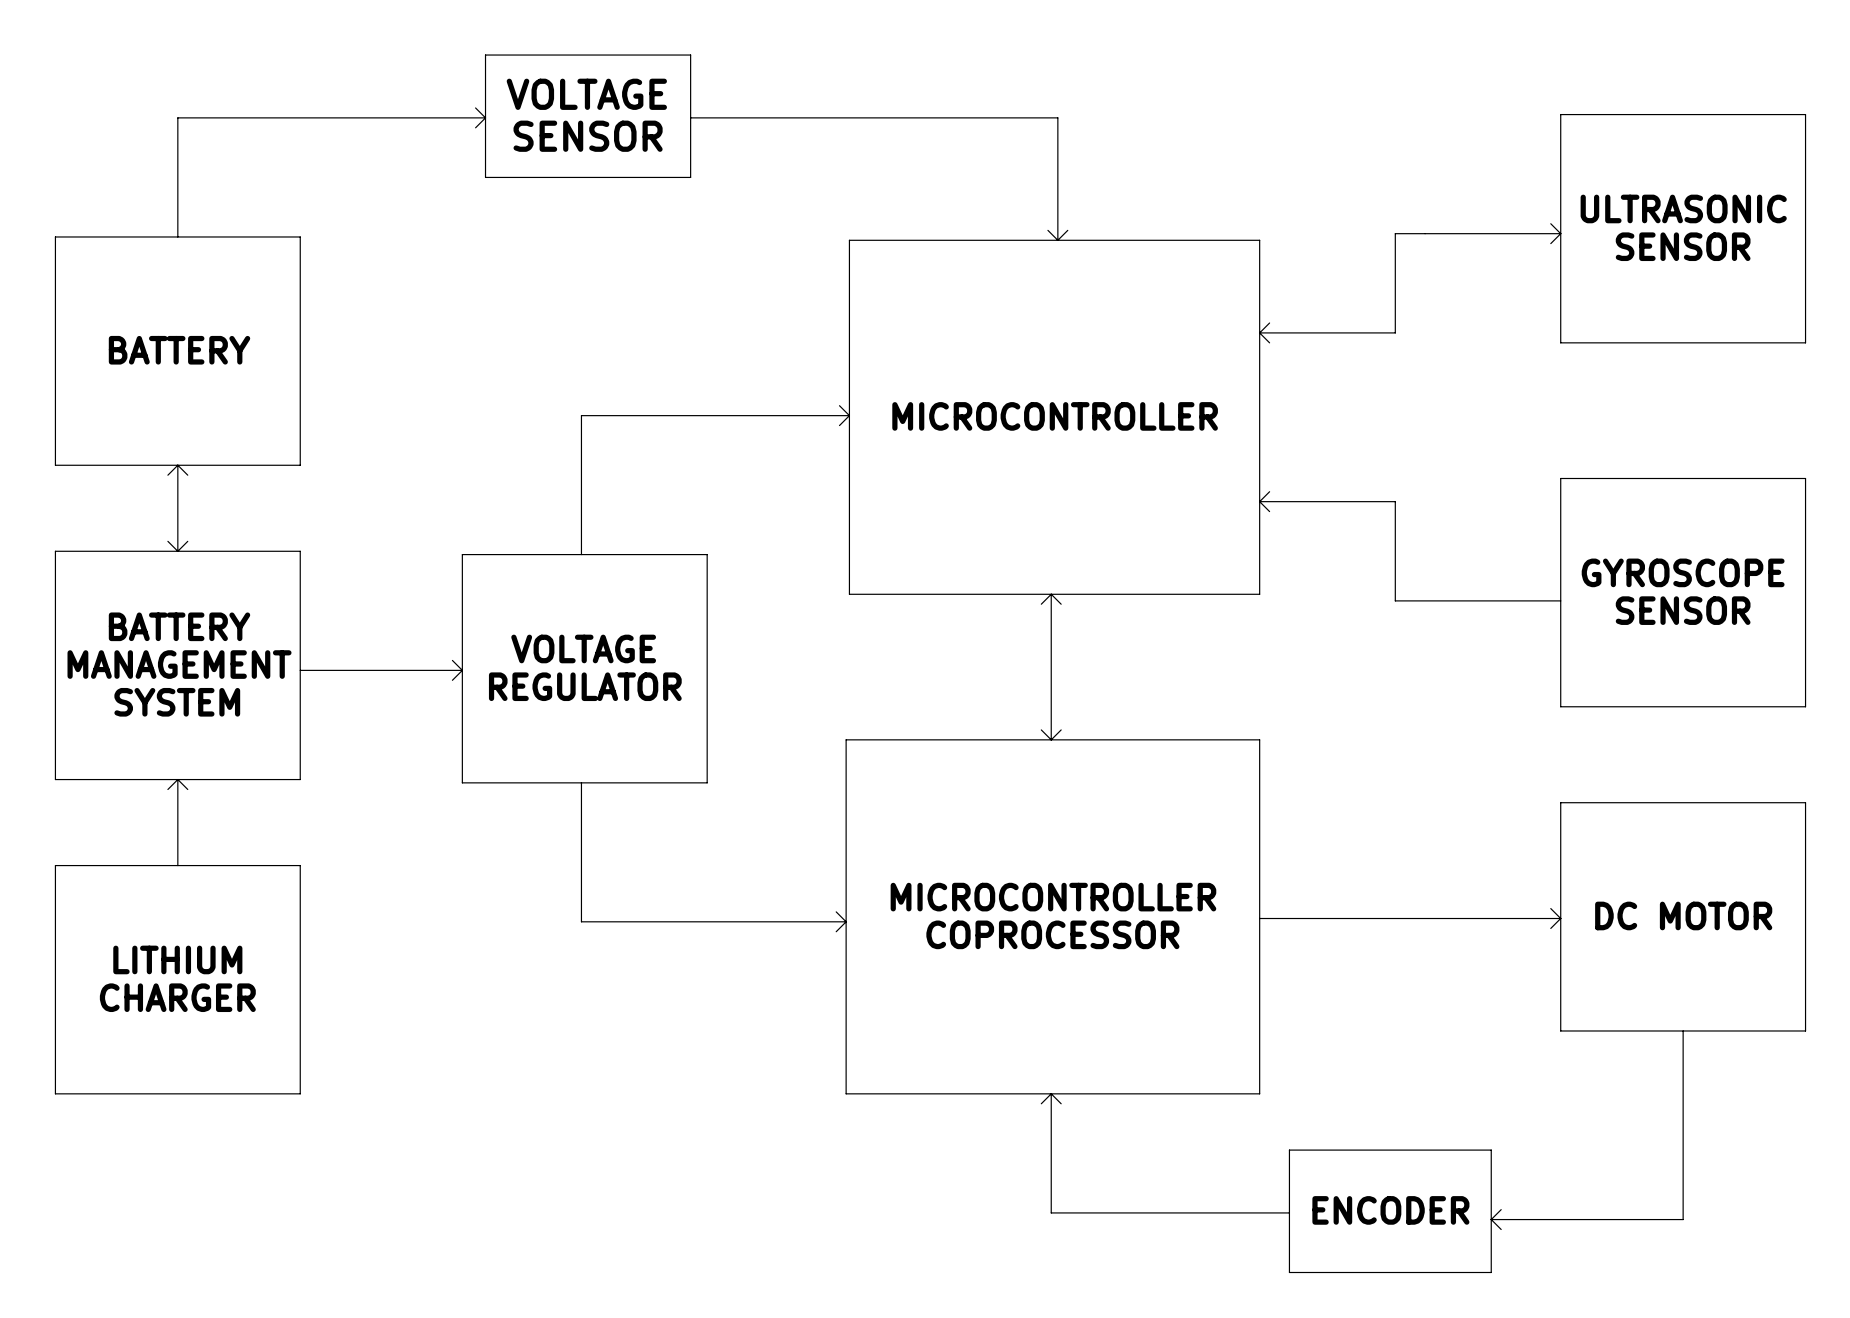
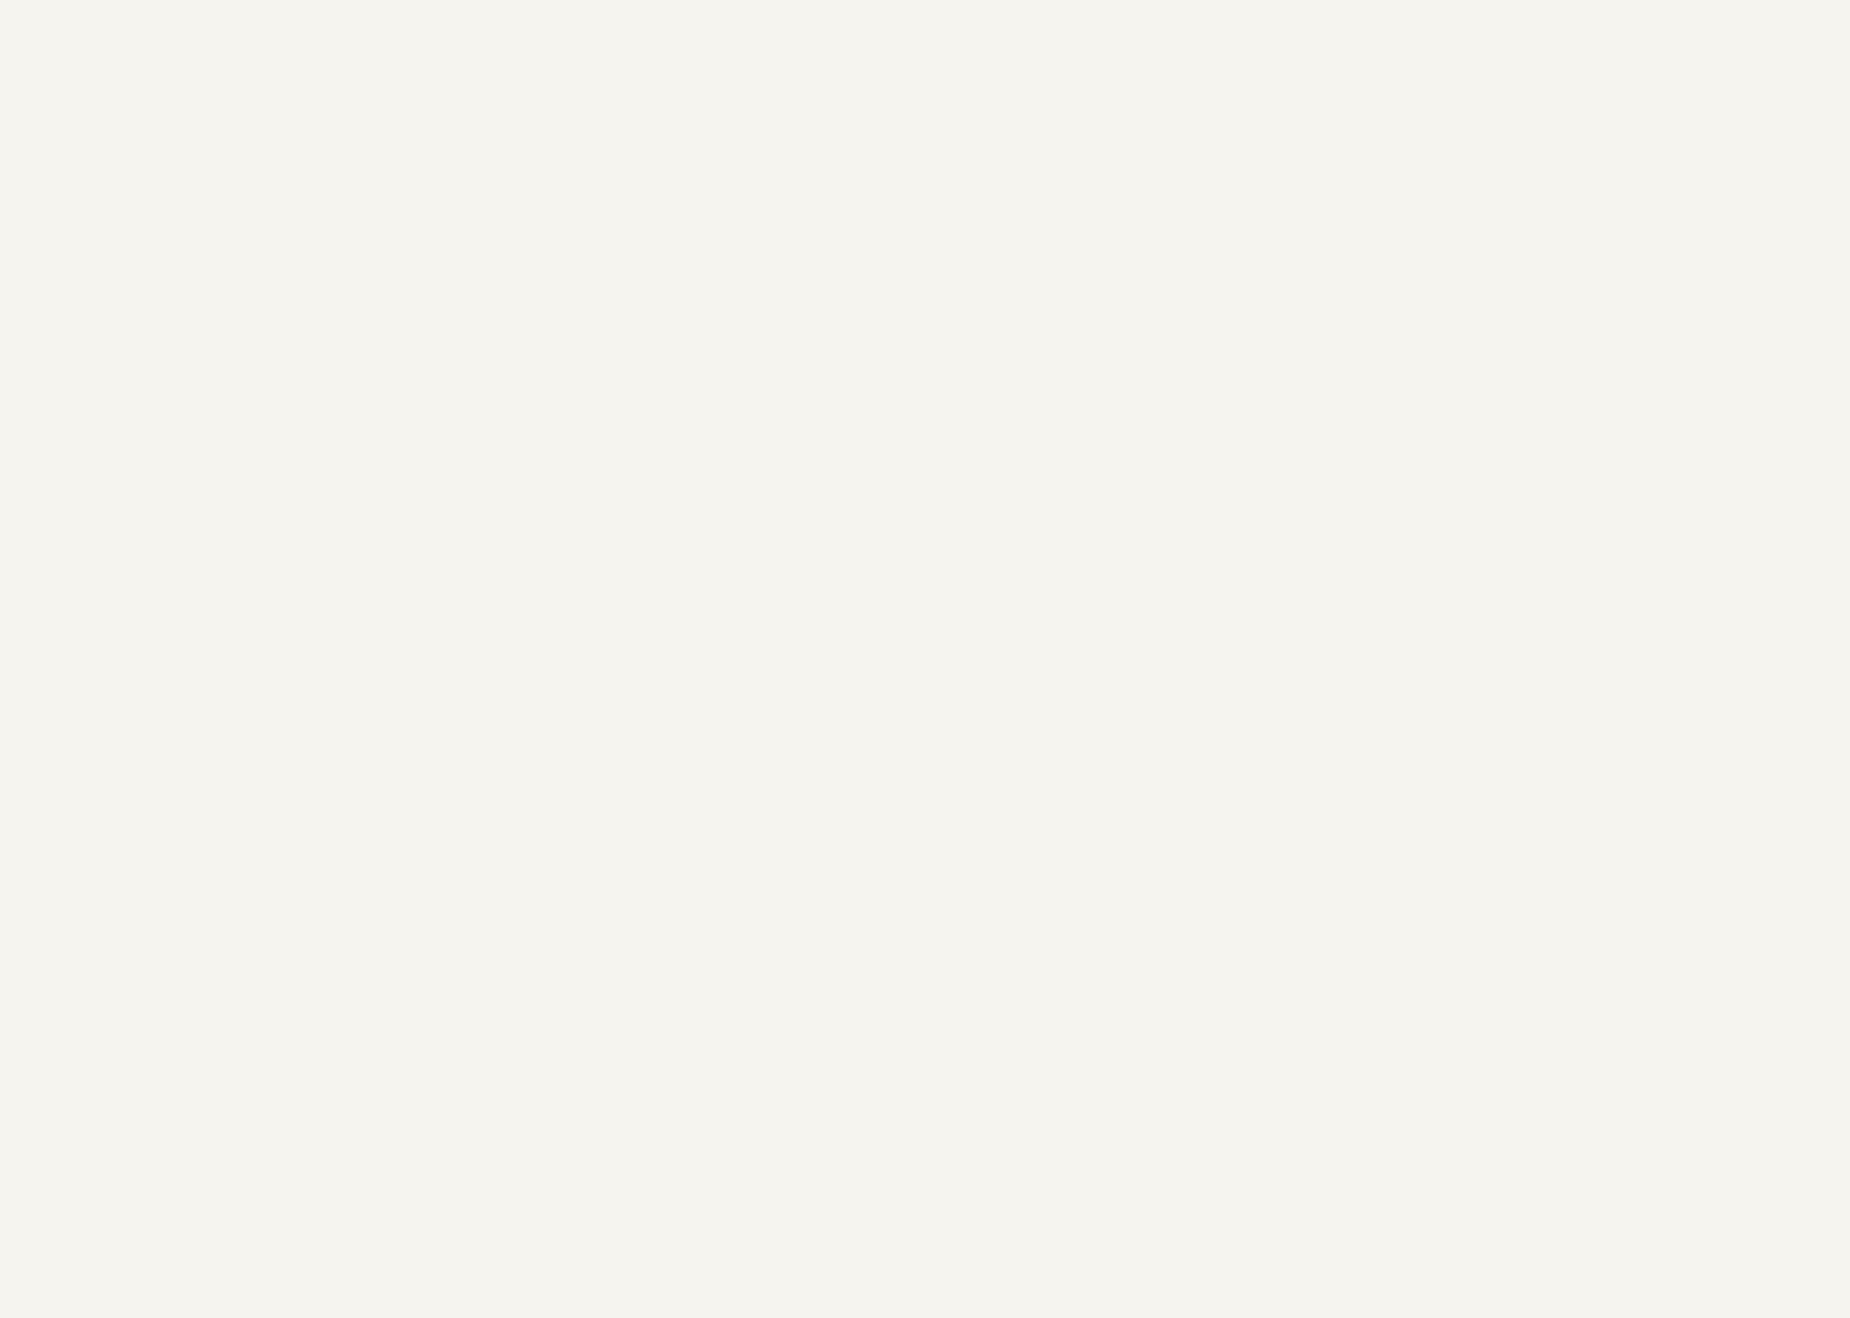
line: (485, 55) (690, 55) (690, 177) (485, 177) (485, 55) -> none
text: VOLTAGE (586, 94) -> none
line: (475, 107) (485, 117) -> none
line: (1560, 114) (1560, 342) (1805, 342) (1805, 114) (1560, 114) -> none
line: (485, 117) (177, 117) (177, 236) -> none
line: (485, 117) (475, 127) -> none
line: (690, 117) (1057, 117) (1057, 240) -> none
text: SENSOR (588, 136) -> none
text: ULTRASONIC (1683, 208) -> none
line: (1550, 223) (1560, 233) -> none
line: (1047, 230) (1057, 240) -> none
line: (1067, 230) (1057, 240) -> none
line: (1560, 233) (1395, 233) (1395, 332) (1259, 332) -> none
line: (1560, 233) (1550, 243) -> none
line: (55, 236) (55, 465) (300, 465) (300, 236) (55, 236) -> none
line: (849, 240) (1259, 240) (1259, 594) (849, 594) (849, 240) -> none
text: SENSOR (1683, 246) -> none
line: (1269, 323) (1259, 332) -> none
line: (1259, 332) (1269, 342) -> none
text: BATTERY (179, 350) -> none
line: (839, 405) (849, 415) -> none
line: (849, 415) (839, 425) -> none
line: (849, 415) (581, 415) (581, 554) -> none
text: MICROCONTROLLER (1055, 416) -> none
line: (177, 465) (177, 551) -> none
line: (177, 465) (187, 475) -> none
line: (177, 465) (167, 475) -> none
line: (1560, 478) (1560, 706) (1805, 706) (1805, 478) (1560, 478) -> none
line: (1269, 491) (1259, 501) -> none
line: (1259, 501) (1269, 511) -> none
line: (1259, 501) (1395, 501) (1395, 600) (1560, 600) -> none
line: (167, 541) (177, 551) -> none
line: (187, 541) (177, 551) -> none
line: (55, 551) (300, 551) (300, 779) (55, 779) (55, 551) -> none
line: (462, 554) (707, 554) (707, 782) (462, 782) (462, 554) -> none
text: GYROSCOPE (1683, 572) -> none
line: (1051, 594) (1051, 739) -> none
line: (1051, 594) (1061, 604) -> none
line: (1051, 594) (1041, 604) -> none
text: SENSOR (1683, 610) -> none
text: BATTERY (179, 626) -> none
text: VOLTAGE (583, 648) -> none
line: (452, 660) (462, 670) -> none
text: MANAGEMENT (179, 664) -> none
line: (300, 670) (462, 670) -> none
line: (462, 670) (452, 680) -> none
text: REGULATOR (585, 686) -> none
text: SYSTEM (177, 702) -> none
line: (1041, 729) (1051, 739) -> none
line: (1061, 729) (1051, 739) -> none
line: (846, 739) (1259, 739) (1259, 1093) (846, 1093) (846, 739) -> none
line: (177, 779) (177, 865) -> none
line: (177, 779) (167, 789) -> none
line: (177, 779) (187, 789) -> none
line: (581, 782) (581, 921) (846, 921) -> none
line: (1560, 802) (1805, 802) (1805, 1030) (1560, 1030) (1560, 802) -> none
line: (55, 865) (55, 1093) (300, 1093) (300, 865) (55, 865) -> none
text: MICROCONTROLLER (1053, 897) -> none
line: (1550, 908) (1560, 918) -> none
line: (836, 911) (846, 921) -> none
text: DC MOTOR (1683, 915) -> none
line: (1259, 918) (1560, 918) -> none
line: (1560, 918) (1550, 928) -> none
line: (846, 921) (836, 931) -> none
text: COPROCESSOR (1052, 934) -> none
text: LITHIUM (177, 959) -> none
text: CHARGER (177, 997) -> none
line: (1683, 1030) (1683, 1219) (1491, 1219) -> none
line: (1051, 1093) (1051, 1212) (1289, 1212) -> none
line: (1051, 1093) (1041, 1103) -> none
line: (1051, 1093) (1061, 1103) -> none
line: (1289, 1150) (1491, 1150) (1491, 1272) (1289, 1272) (1289, 1150) -> none
line: (1501, 1209) (1491, 1219) -> none
text: ENCODER (1390, 1210) -> none
line: (1491, 1219) (1501, 1229) -> none

